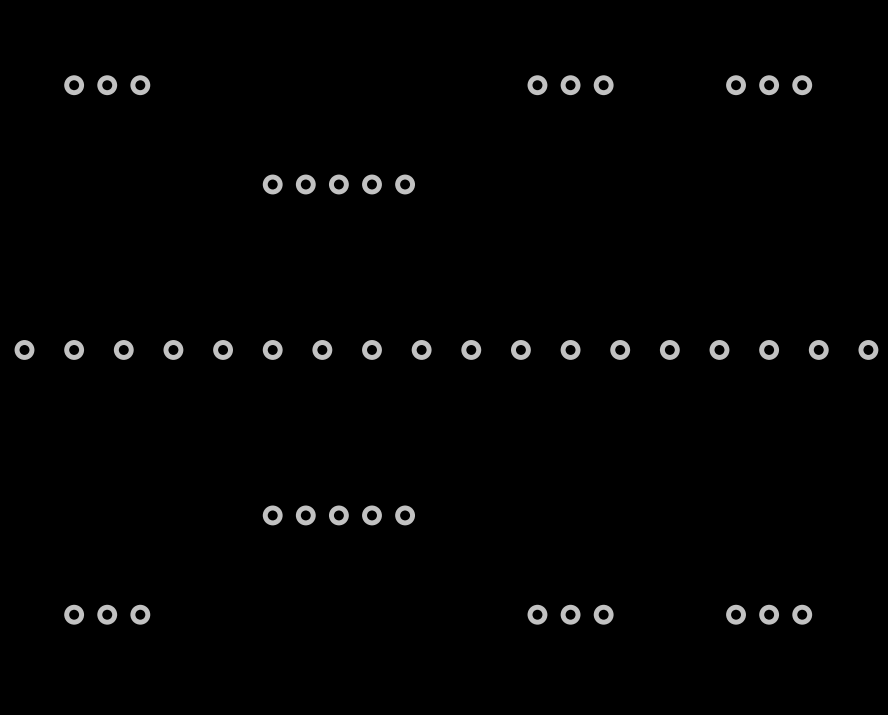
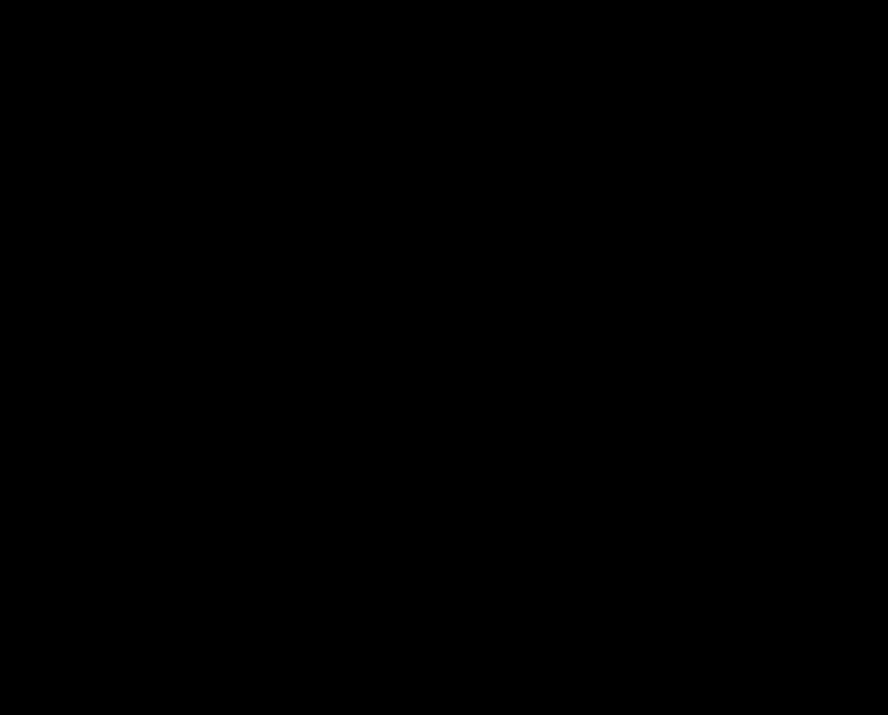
via: (74, 85) -> none
via: (107, 85) -> none
via: (140, 85) -> none
via: (537, 85) -> none
via: (570, 85) -> none
via: (603, 85) -> none
via: (736, 85) -> none
via: (769, 85) -> none
via: (802, 85) -> none
via: (272, 184) -> none
via: (305, 184) -> none
via: (338, 184) -> none
via: (371, 184) -> none
via: (405, 184) -> none
via: (24, 349) -> none
via: (74, 349) -> none
via: (123, 349) -> none
via: (173, 349) -> none
via: (223, 349) -> none
via: (272, 349) -> none
via: (322, 349) -> none
via: (371, 349) -> none
via: (421, 349) -> none
via: (471, 349) -> none
via: (520, 349) -> none
via: (570, 349) -> none
via: (620, 349) -> none
via: (669, 349) -> none
via: (719, 349) -> none
via: (769, 349) -> none
via: (818, 349) -> none
via: (868, 349) -> none
via: (272, 515) -> none
via: (305, 515) -> none
via: (338, 515) -> none
via: (371, 515) -> none
via: (405, 515) -> none
via: (74, 614) -> none
via: (107, 614) -> none
via: (140, 614) -> none
via: (537, 614) -> none
via: (570, 614) -> none
via: (603, 614) -> none
via: (736, 614) -> none
via: (769, 614) -> none
via: (802, 614) -> none

